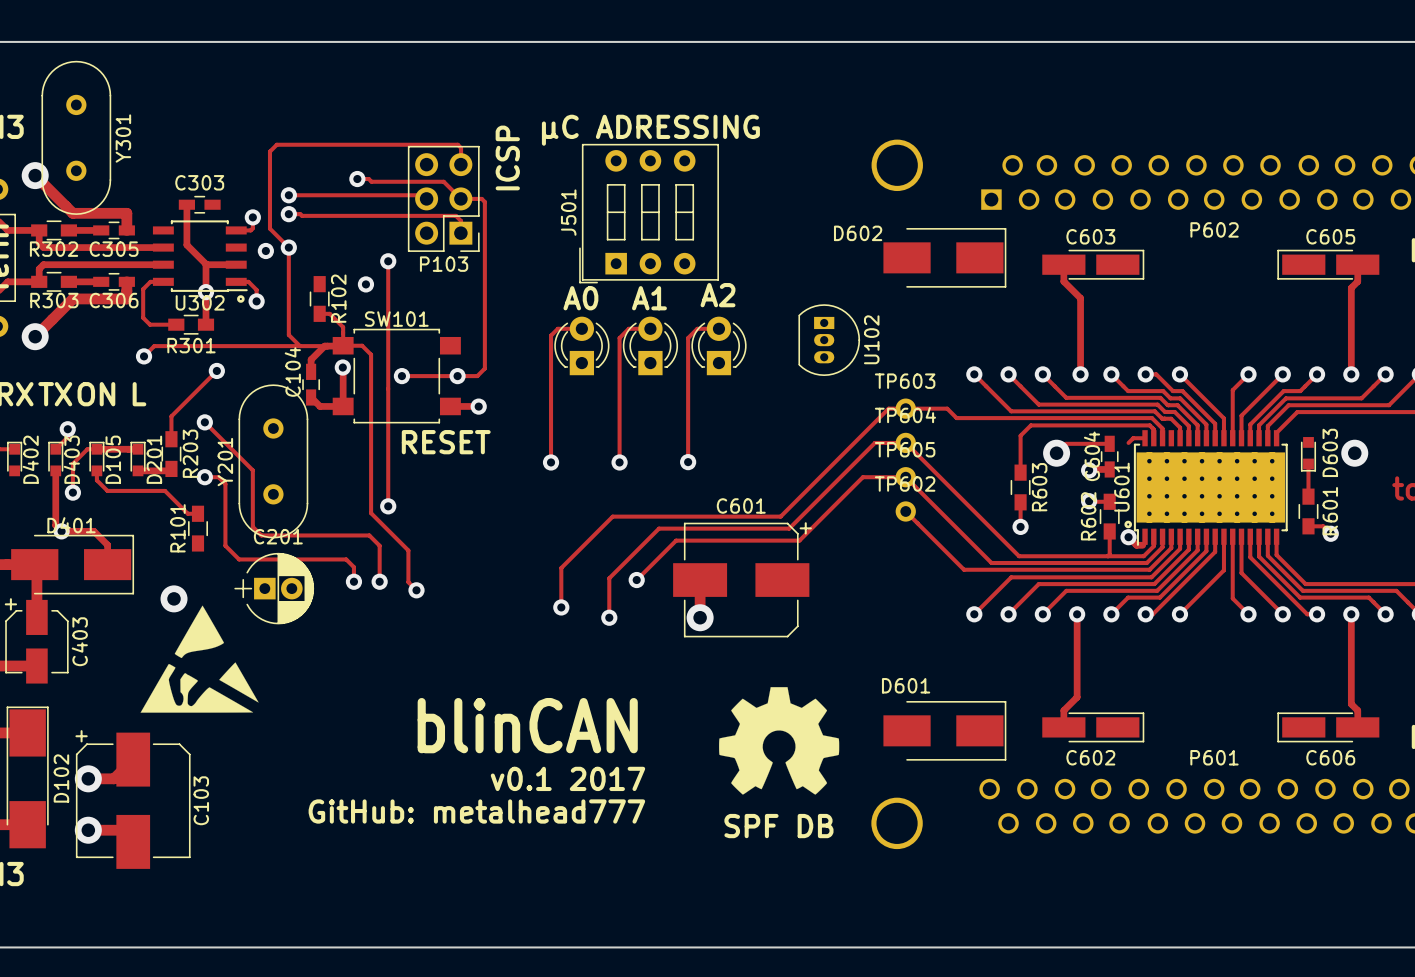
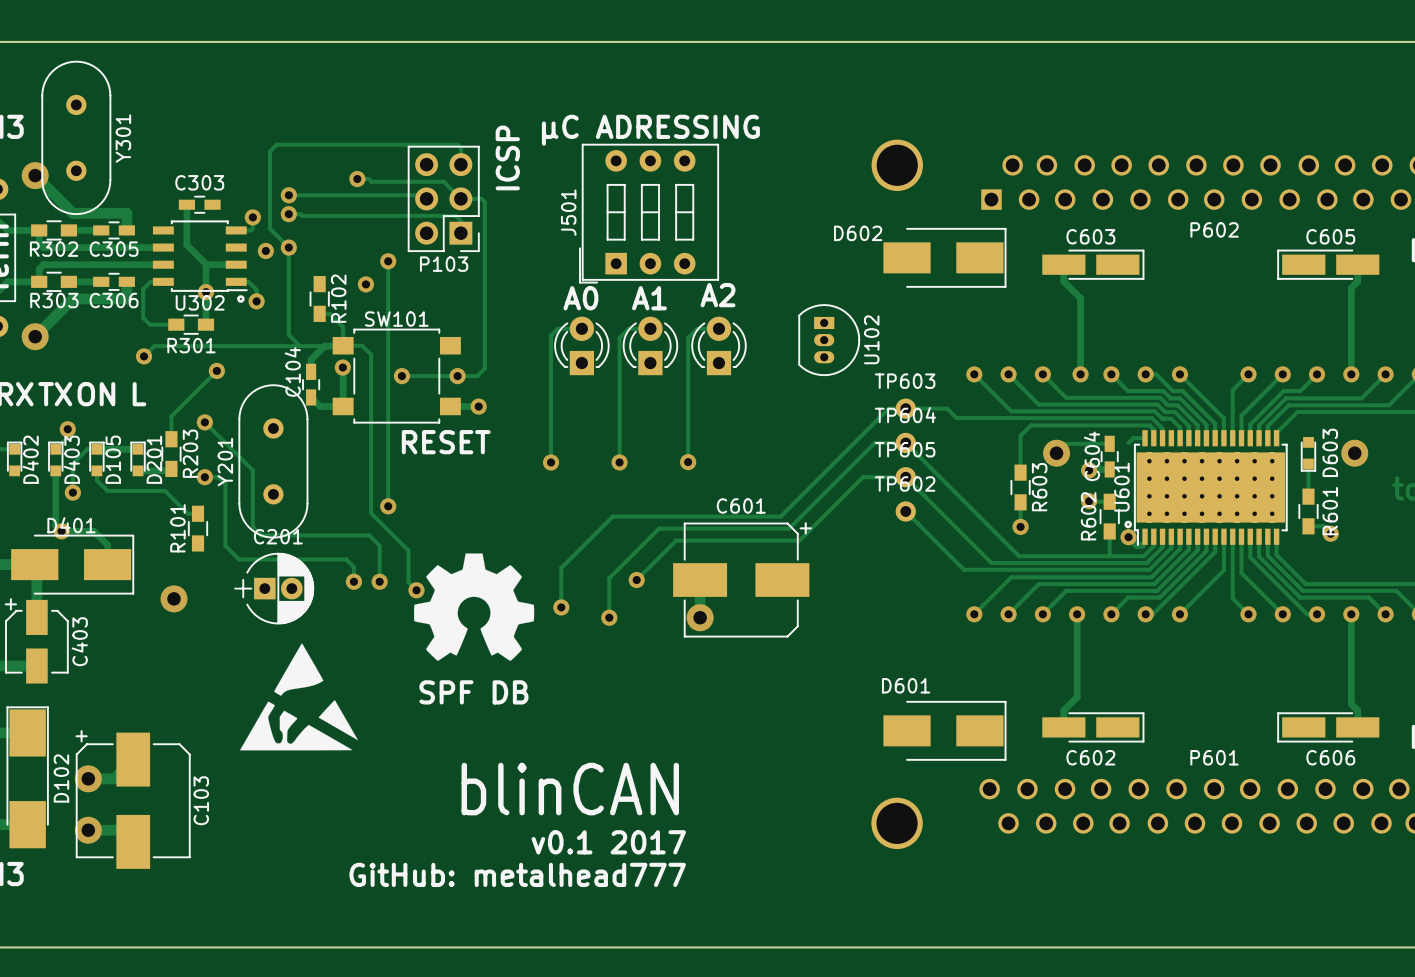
drawing position: (199, 659) -> (298, 696)
text position: blinCAN (527, 725) -> blinCAN (570, 789)
drawing position: (779, 740) -> (474, 607)
text position: v0.1 2017 (567, 778) -> v0.1 2017 (608, 842)
text position: GitHub: metalhead777 (476, 811) -> GitHub: metalhead777 (517, 874)
text position: SPF DB (778, 826) -> SPF DB (473, 692)

